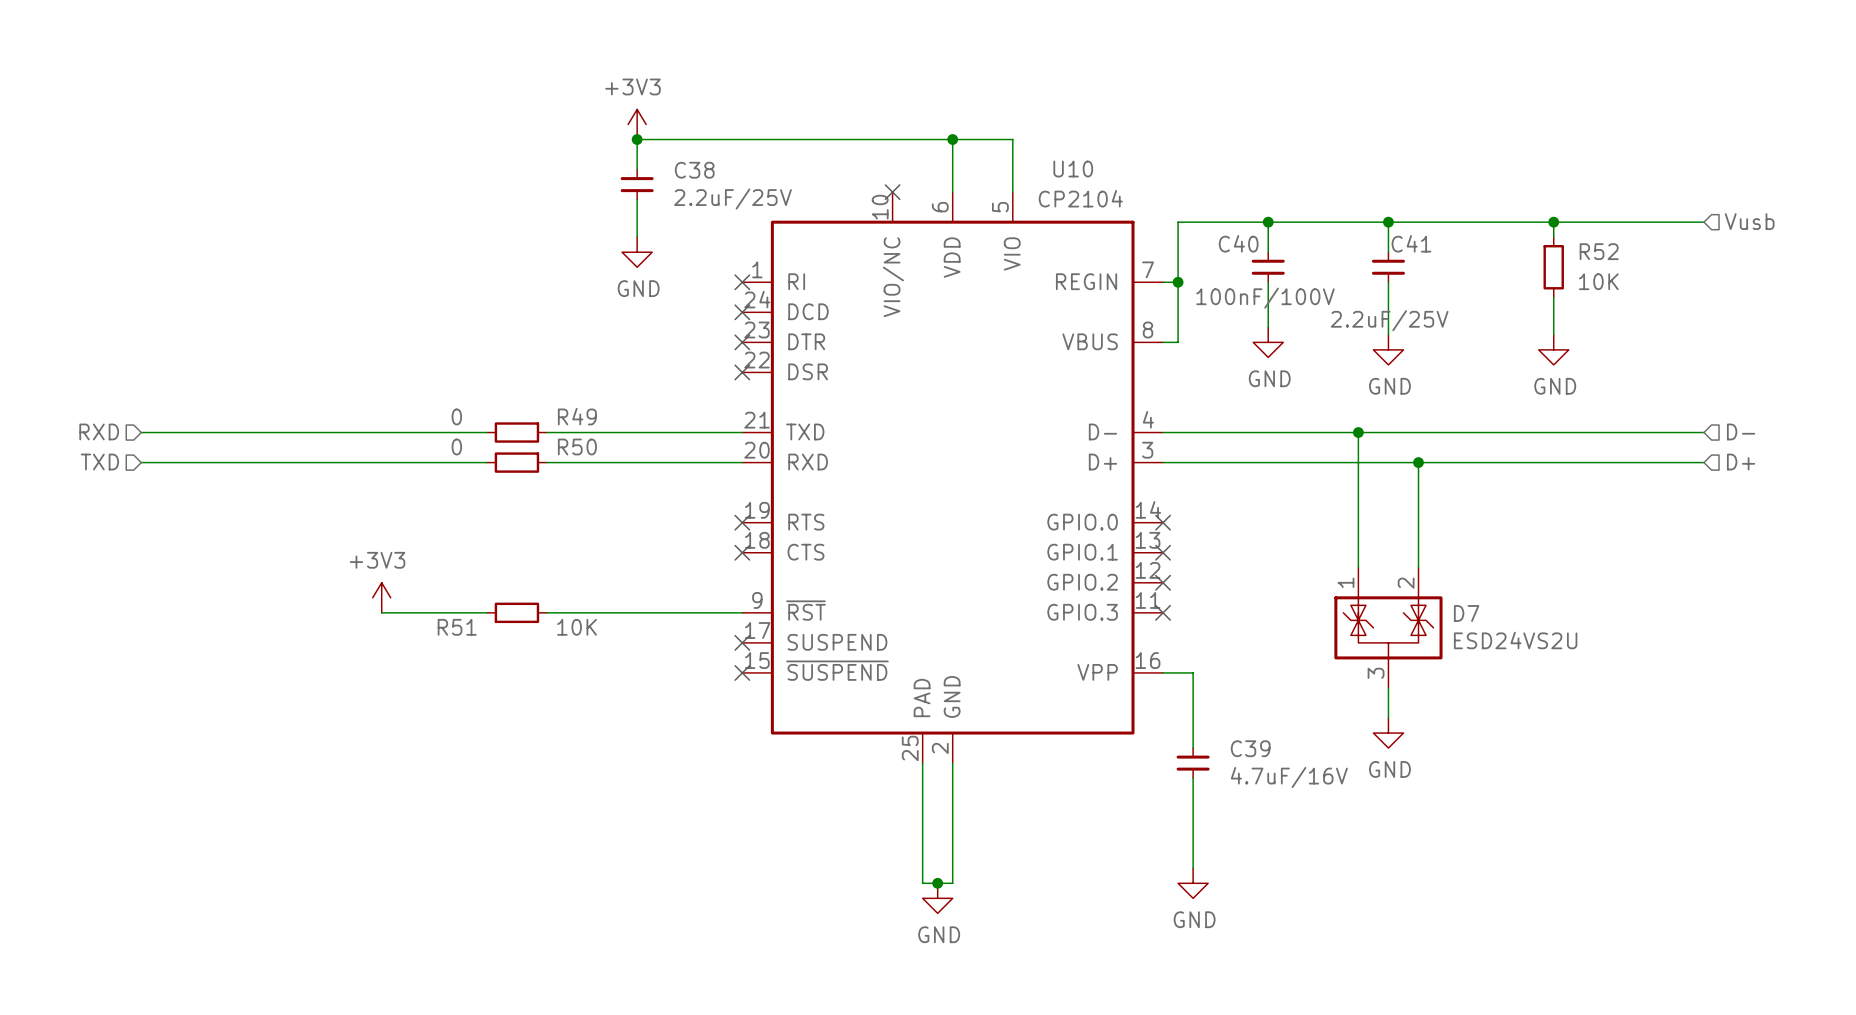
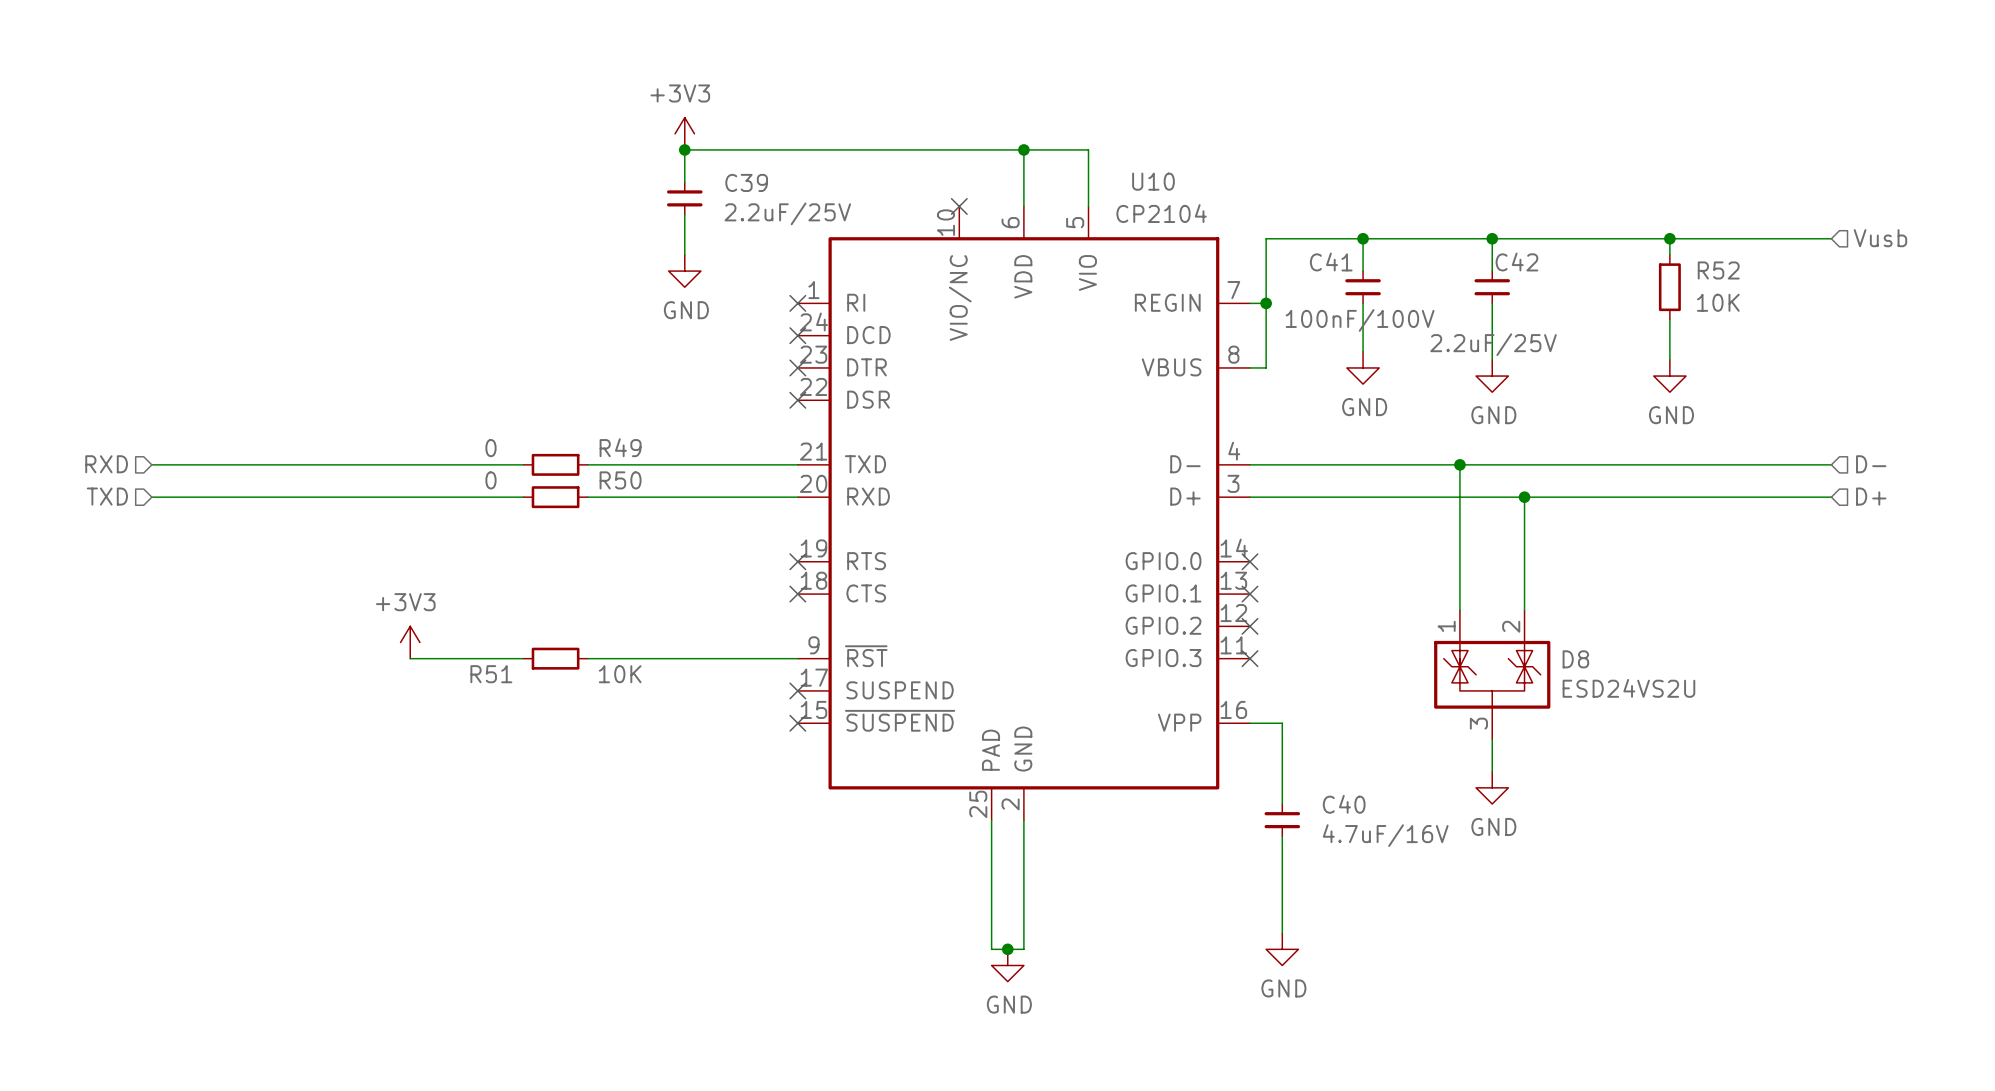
C38 name: C38 (694, 170) -> C39 (746, 182)
C40 name: C40 (1238, 243) -> C41 (1331, 262)
C41 name: C41 (1411, 243) -> C42 (1516, 262)
D7 name: D7 (1466, 613) -> D8 (1575, 659)
C39 name: C39 (1250, 748) -> C40 (1344, 804)

